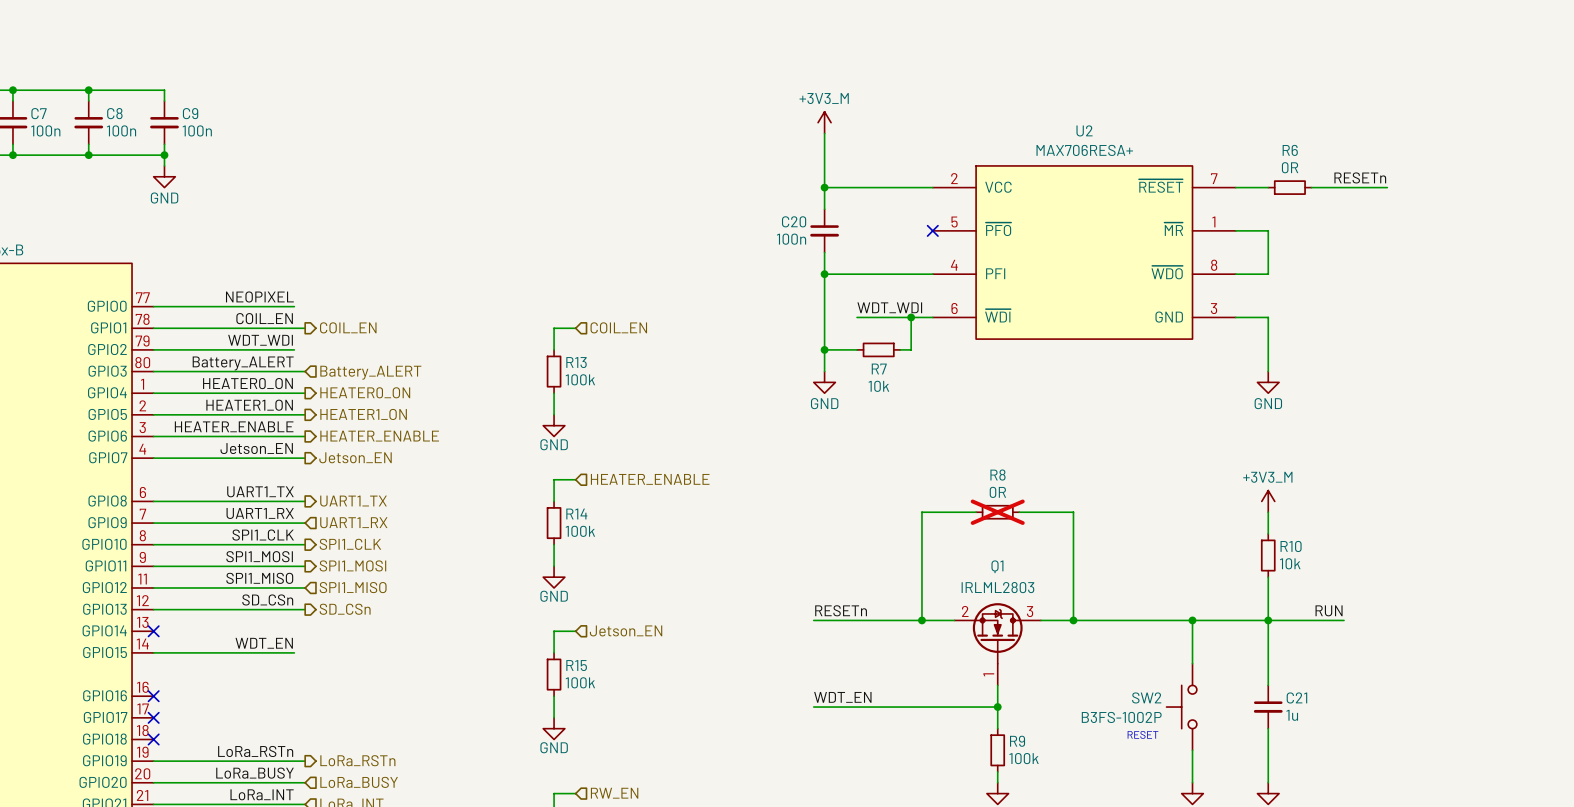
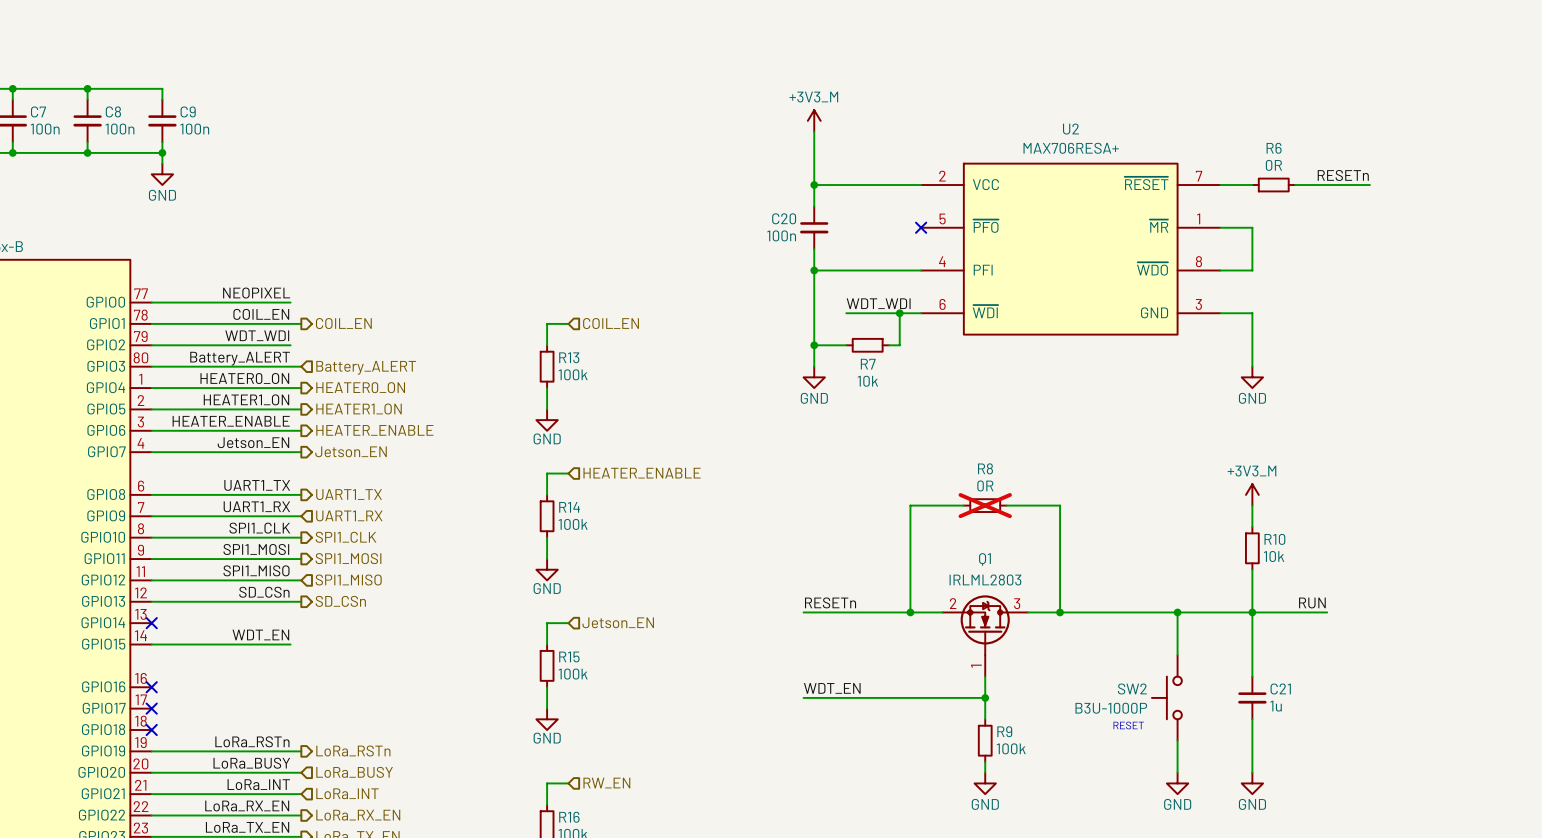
SW2 value: B3FS-1002P (1121, 717) -> B3U-1000P (1111, 708)

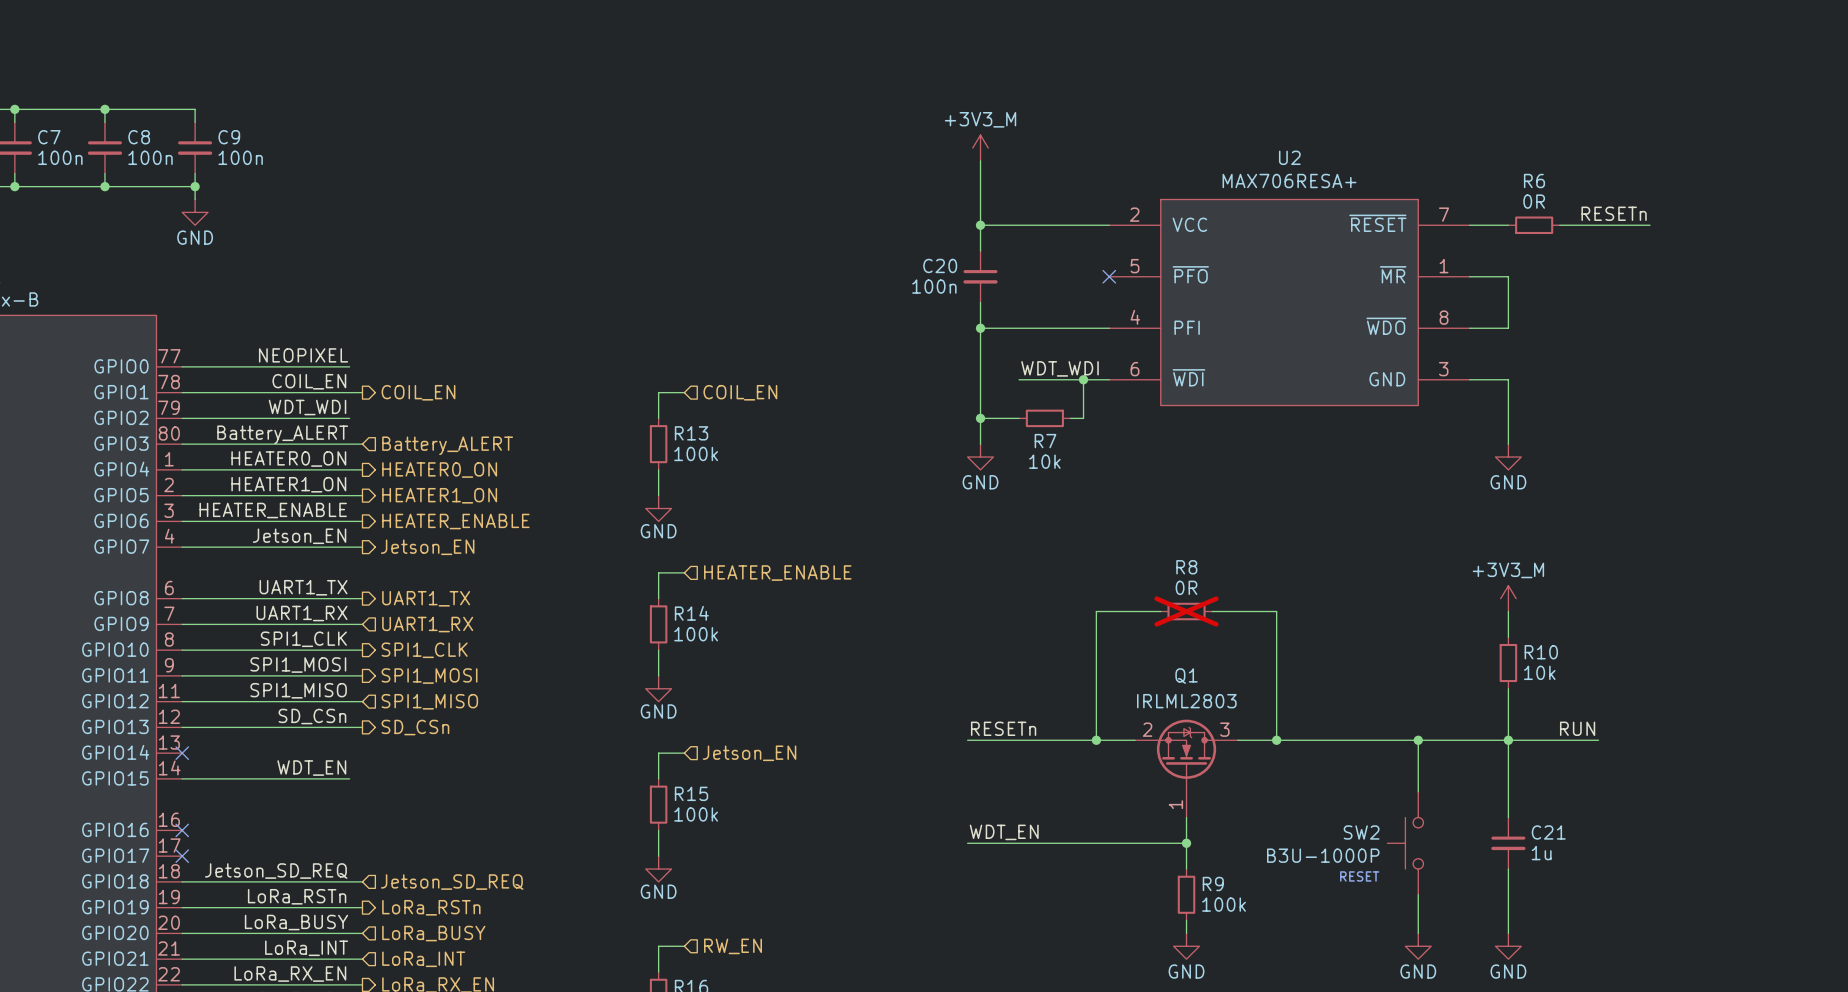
label: none -> Jetson_SD_REQ (276, 871)
wire: none -> (182, 881) (362, 881)
no-connect mark: (151, 730) -> none
hierarchical label: none -> Jetson_SD_REQ (452, 882)

